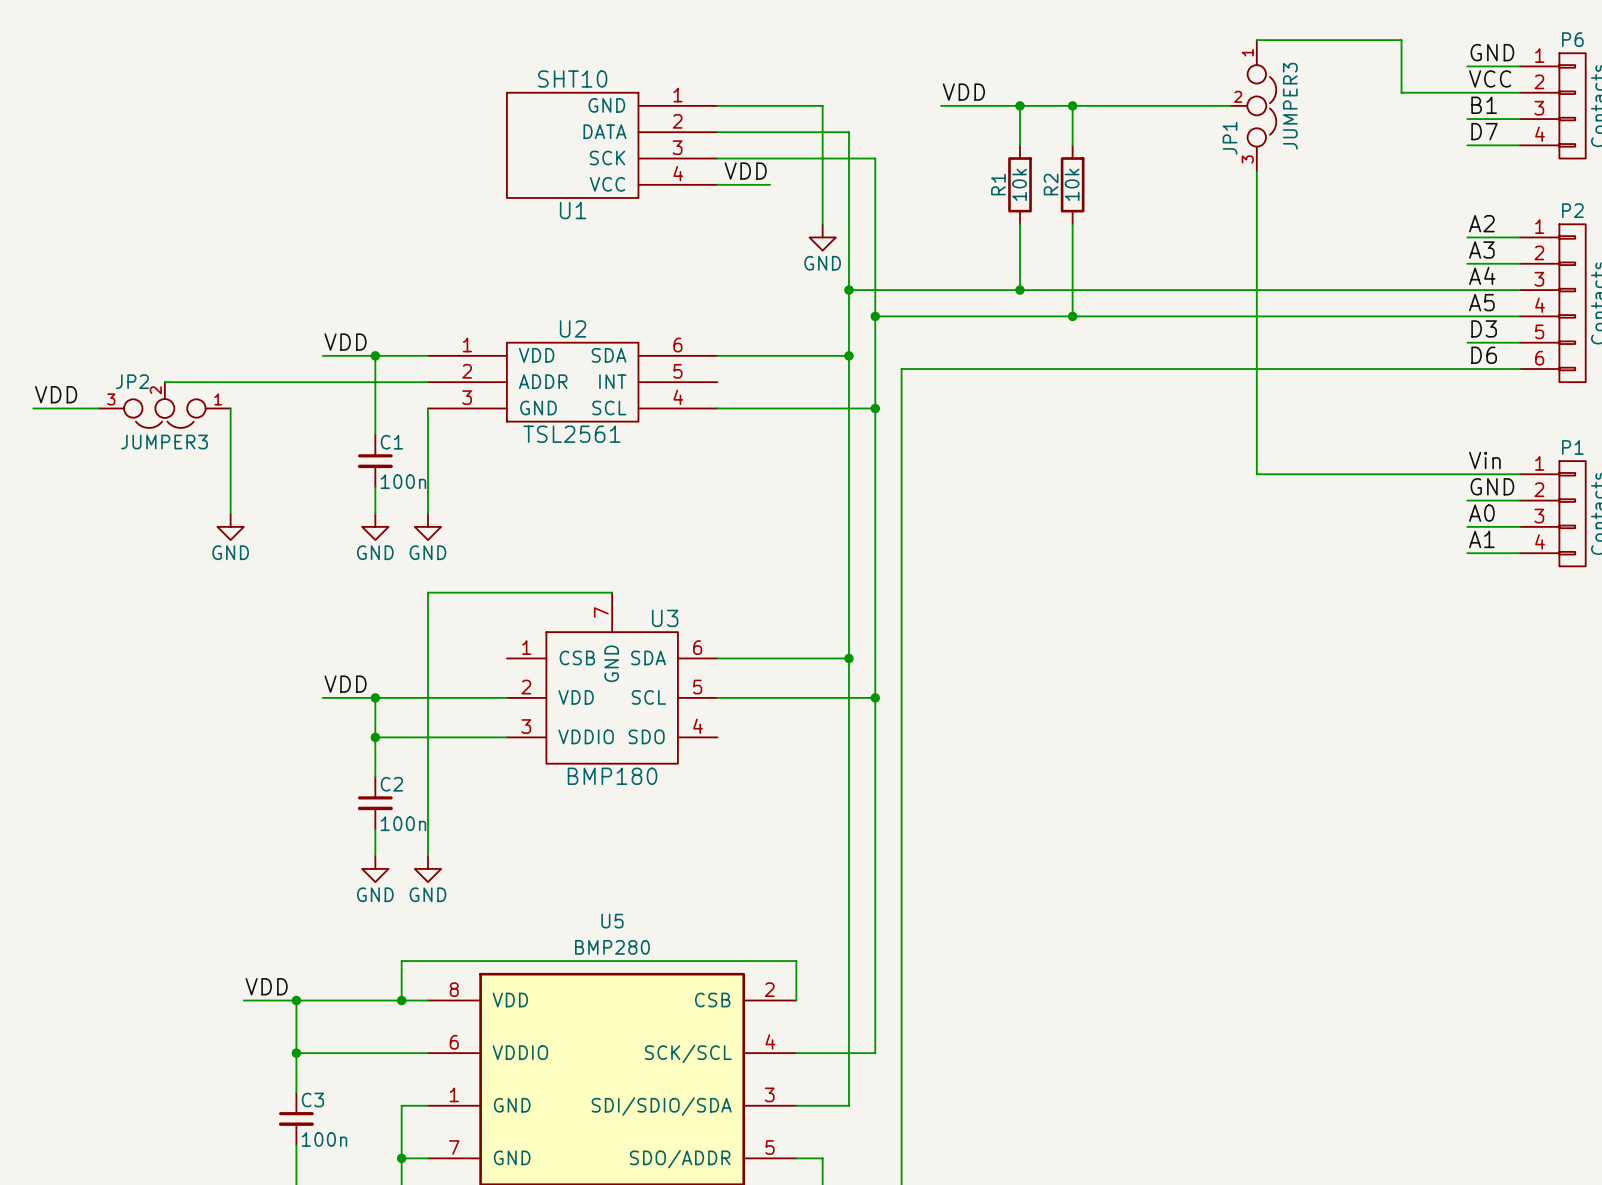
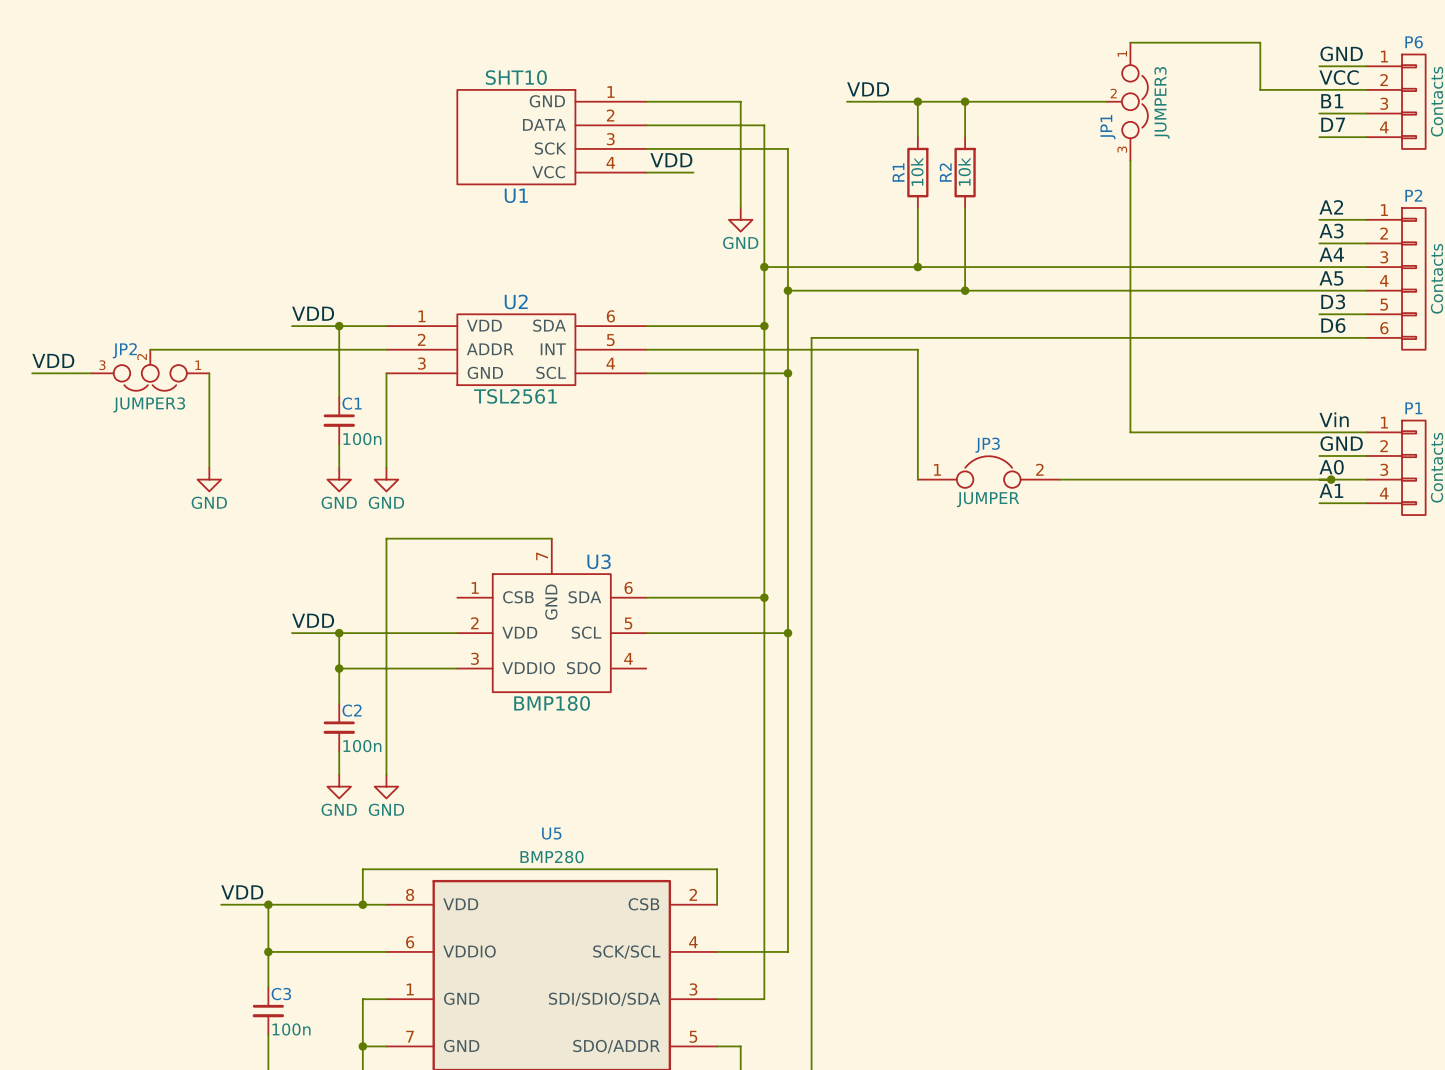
wire: none -> (646, 349) (917, 349) (917, 479)
JP3: none -> JUMPER (988, 472)
wire: none -> (1059, 479) (1319, 479)
junction: none -> (1331, 479)

